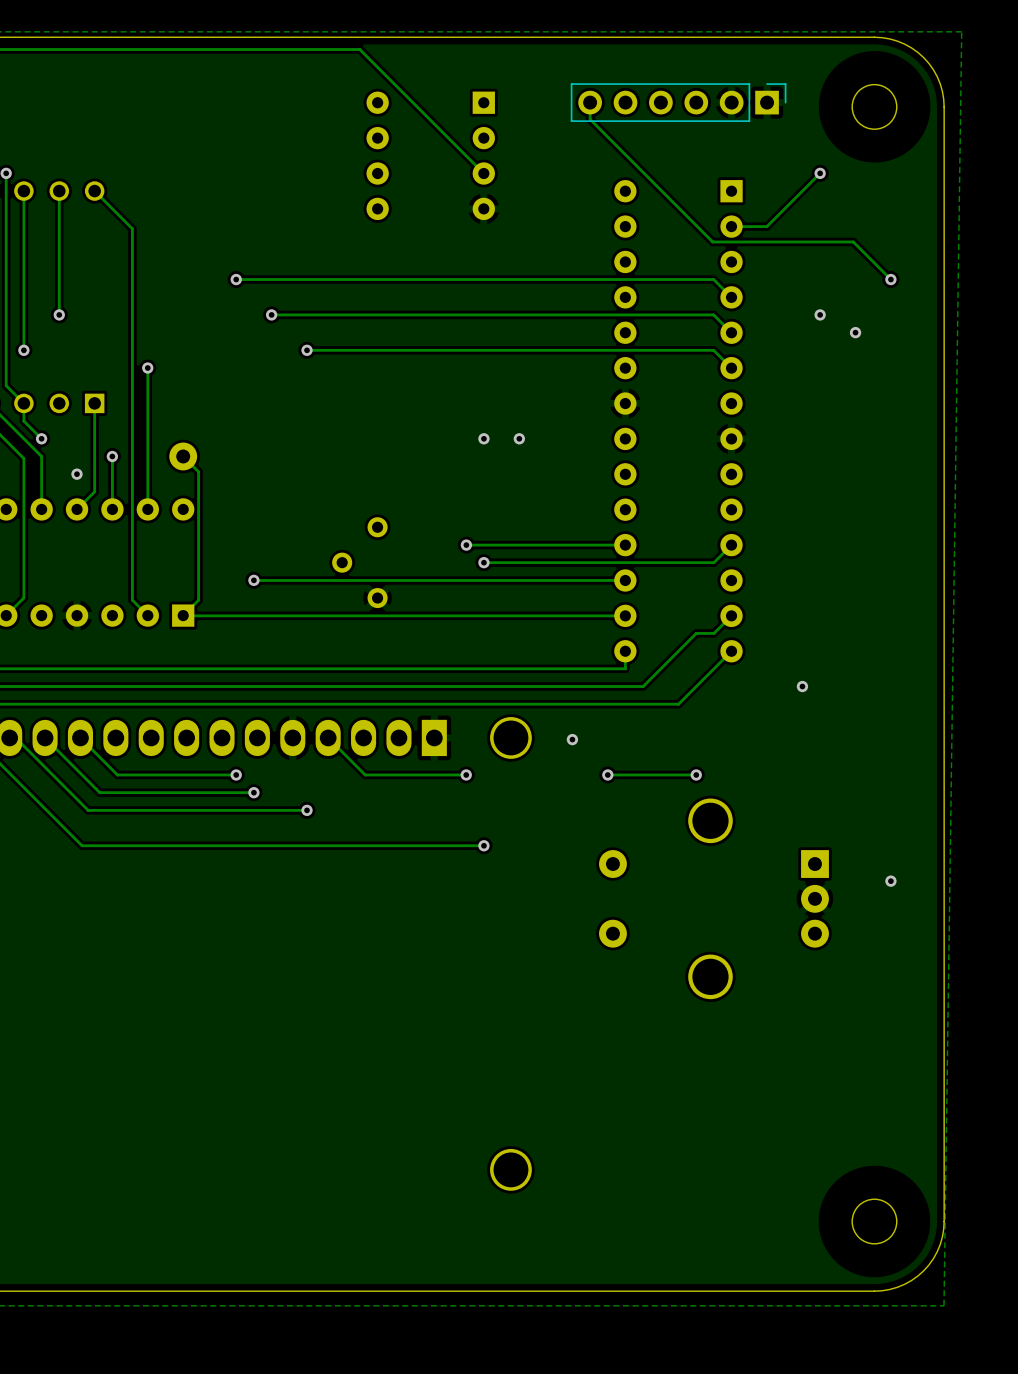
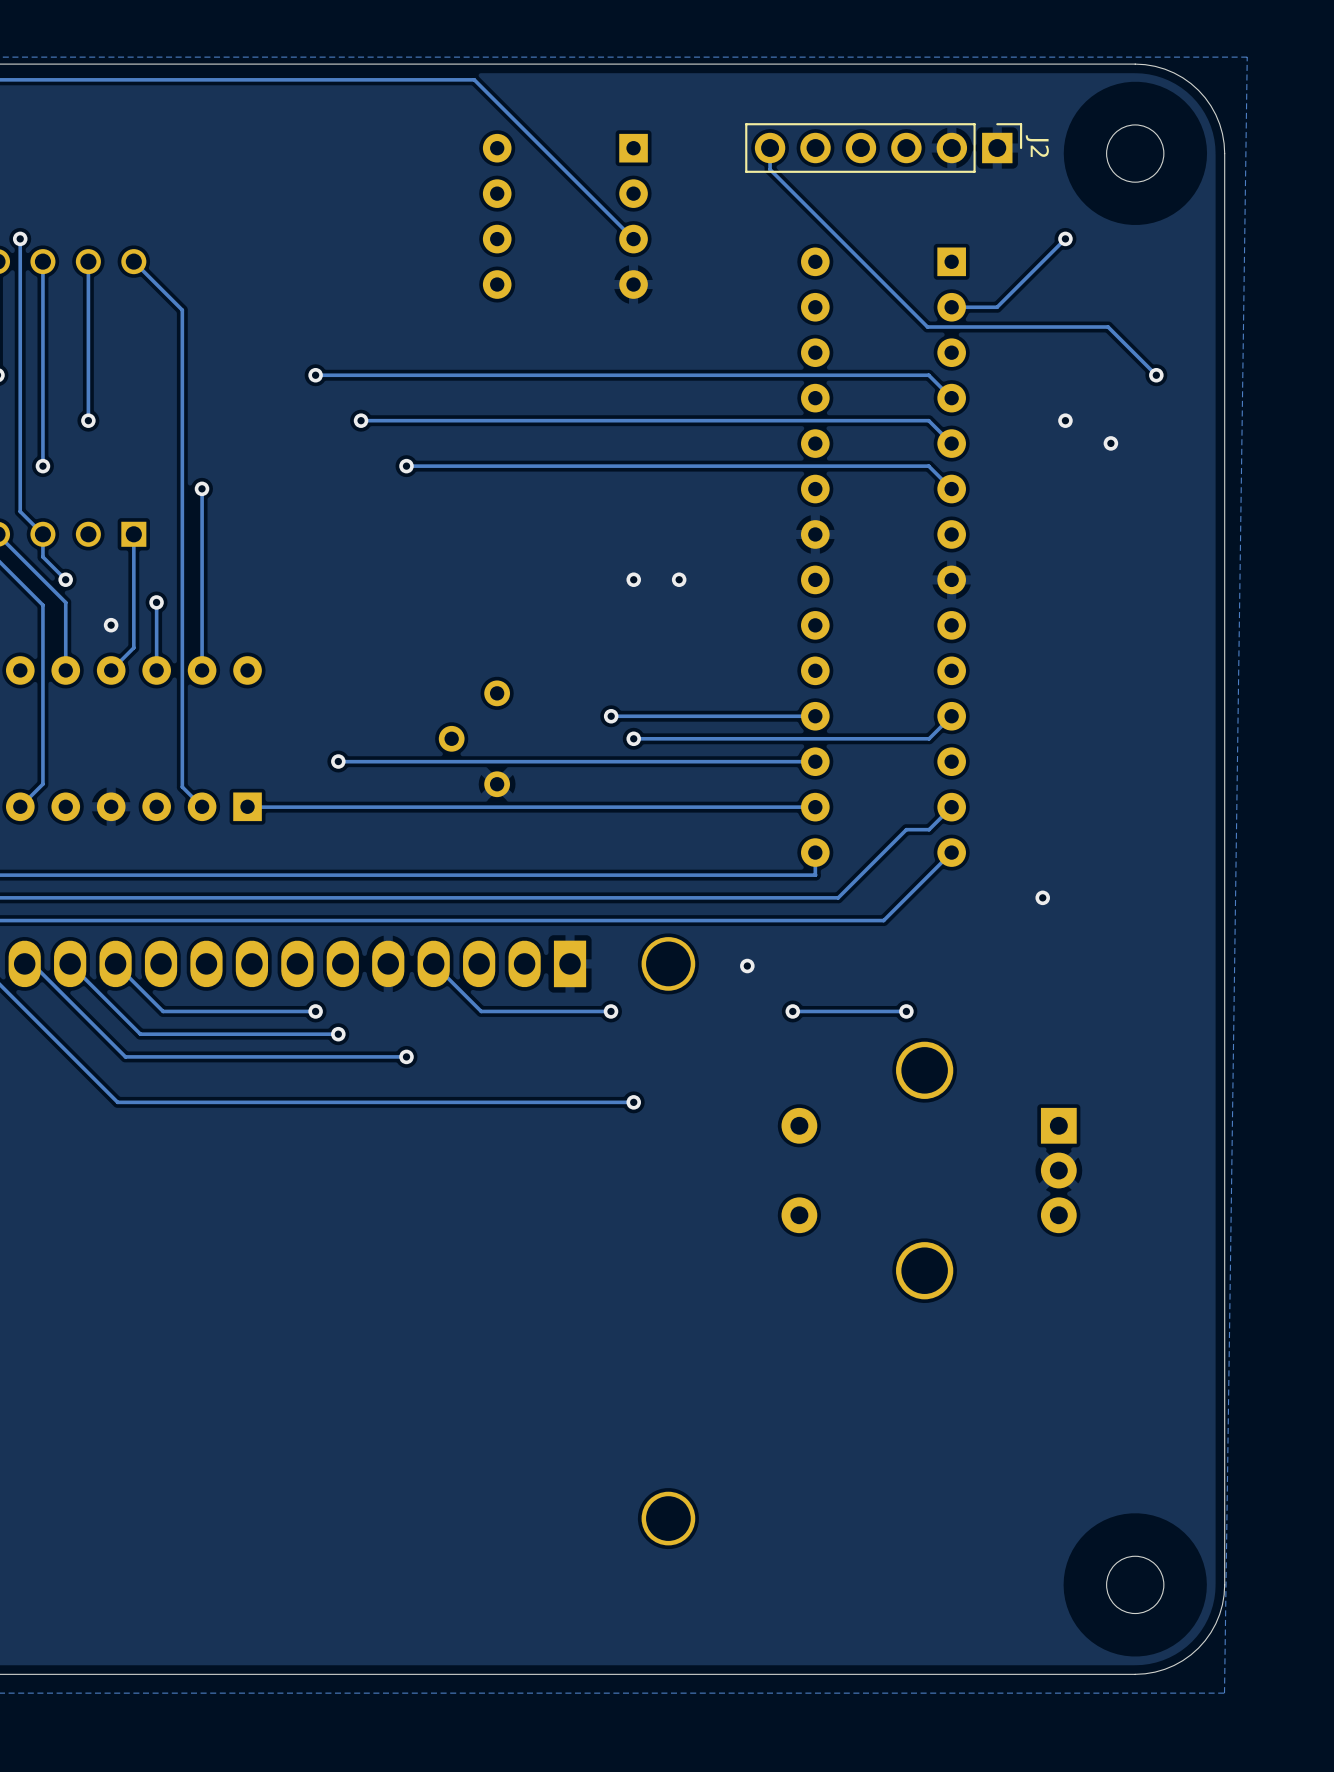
J2 name: none -> J2 (1037, 146)
track: (183, 456) (198, 471) (198, 600) (183, 615) -> none
part: (183, 456) -> none
via: (890, 881) -> none

